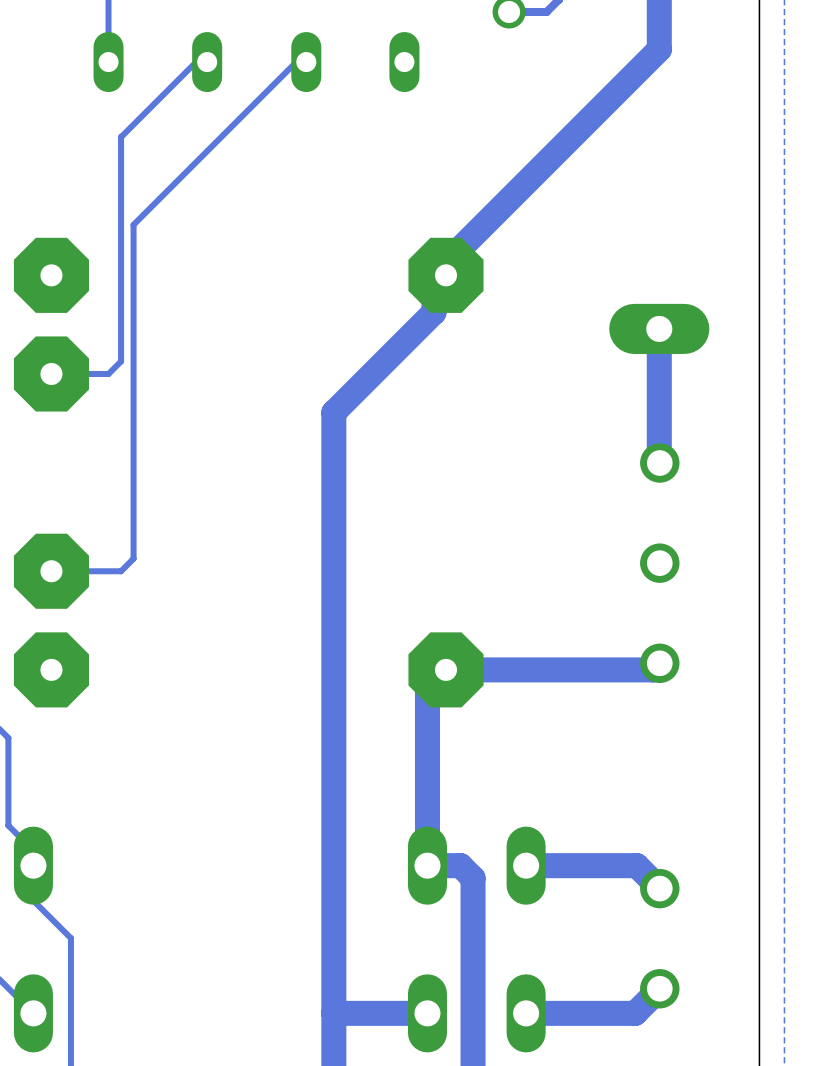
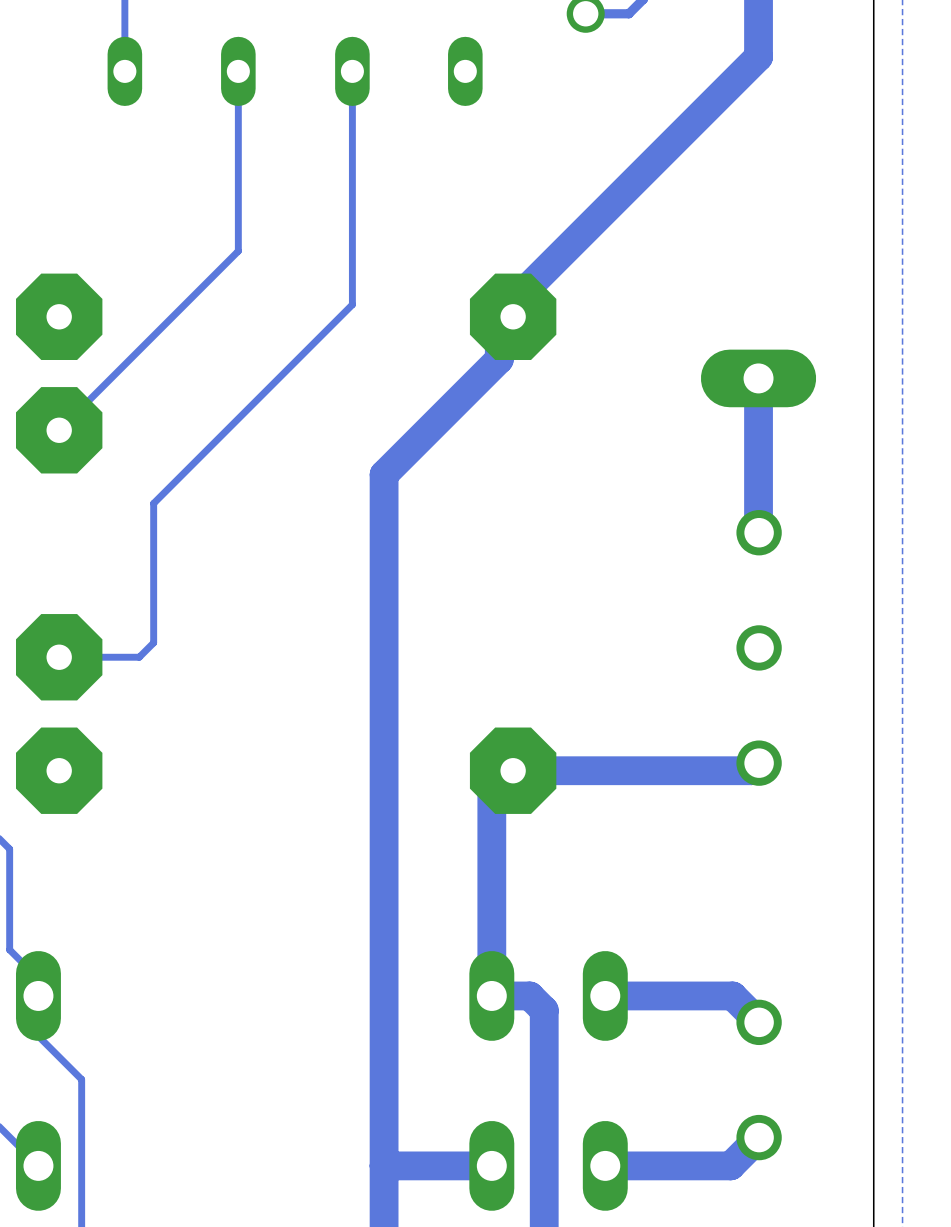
bottom track: (207, 62) (196, 62) (121, 137) (121, 361) (108, 373) (51, 373) -> (238, 71) (238, 251) (59, 430)
bottom track: (306, 62) (296, 62) (133, 224) (133, 437) -> (352, 71) (352, 304) (153, 503)

